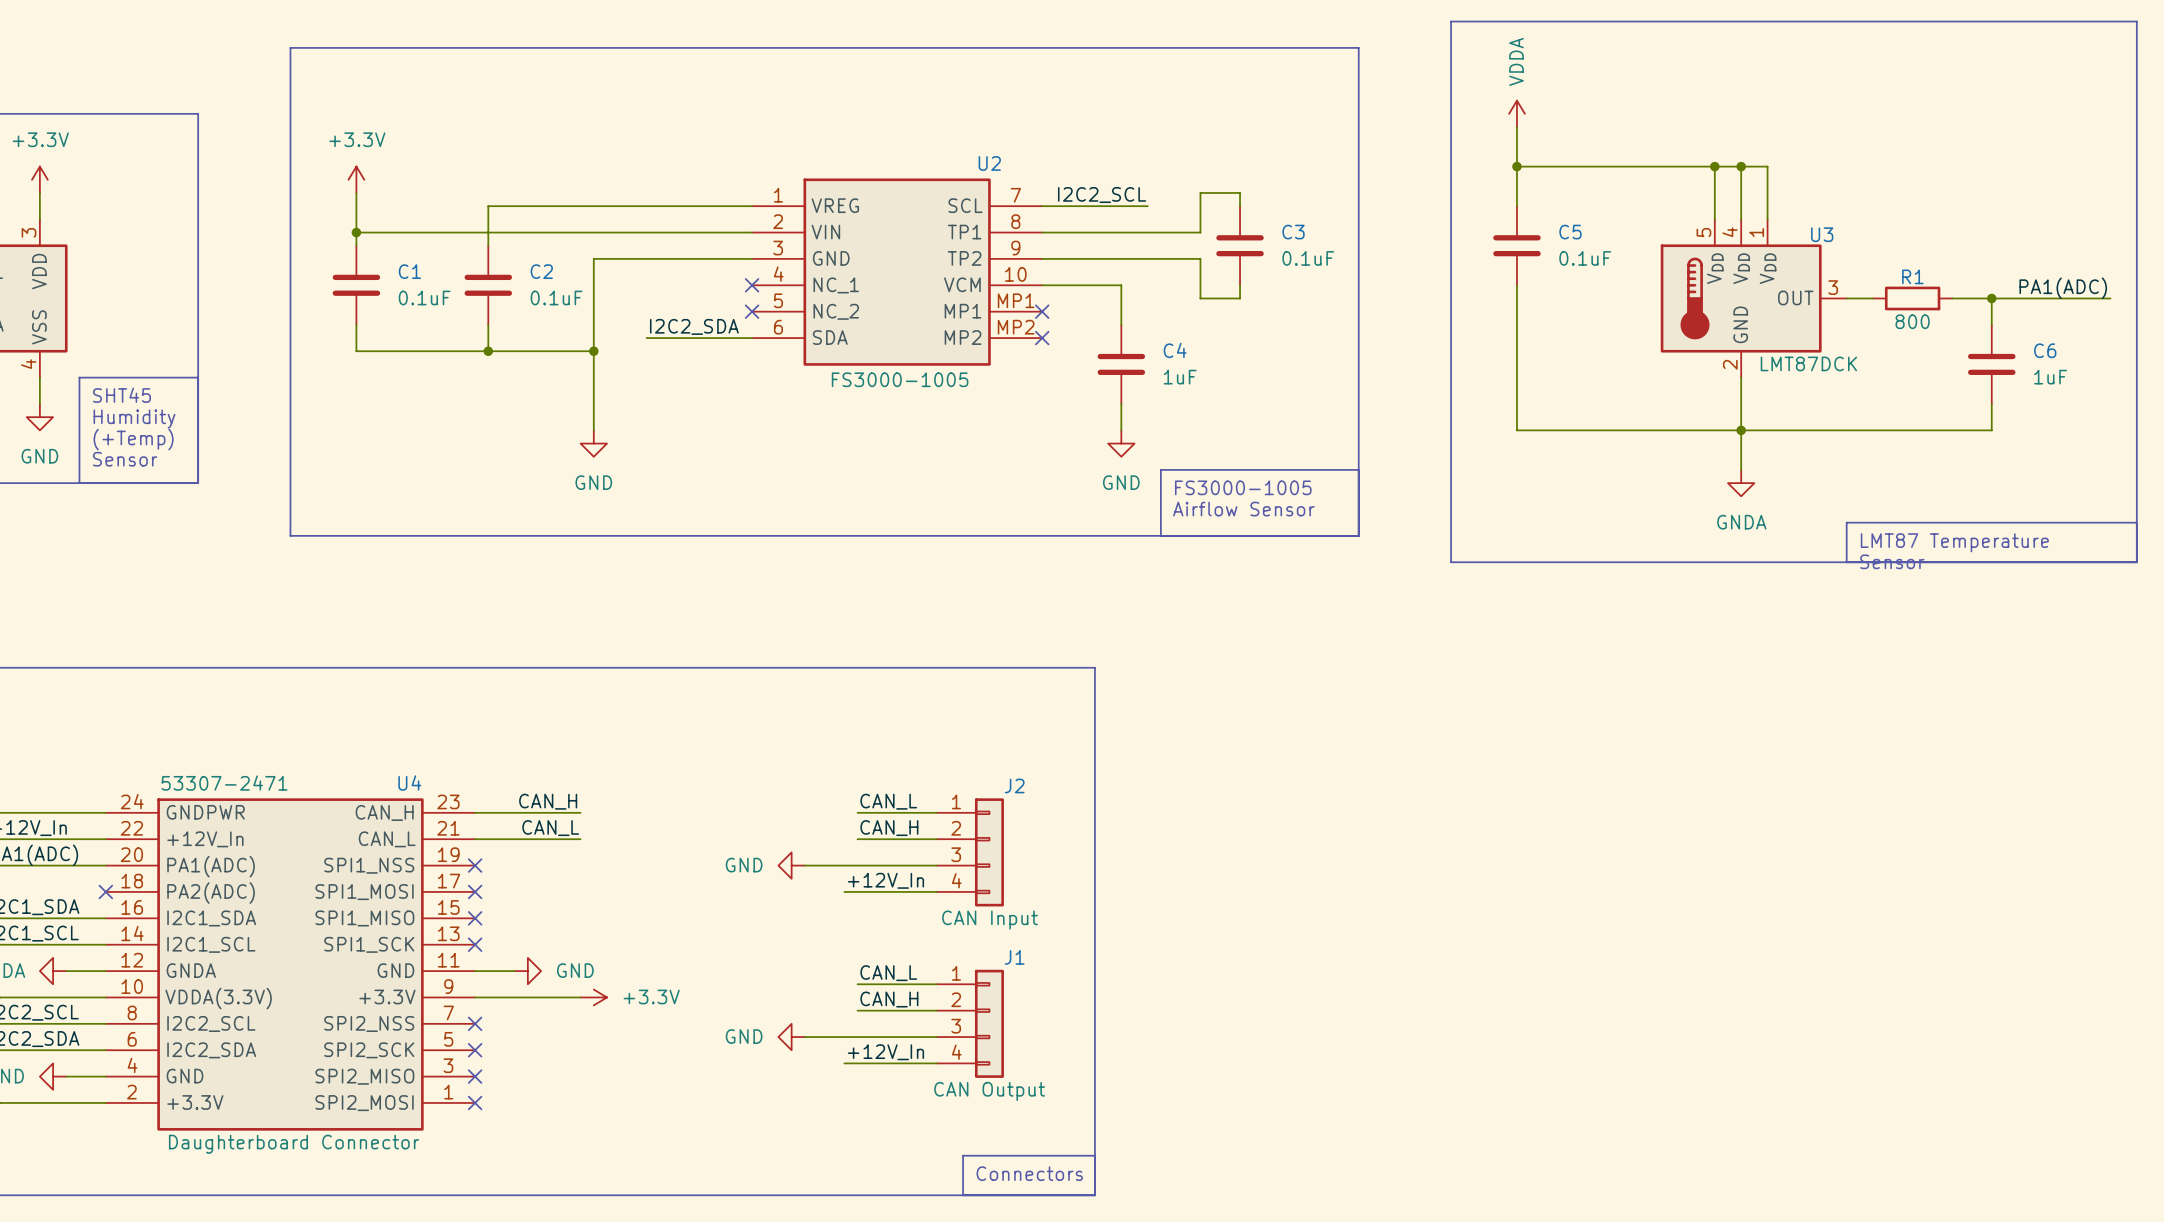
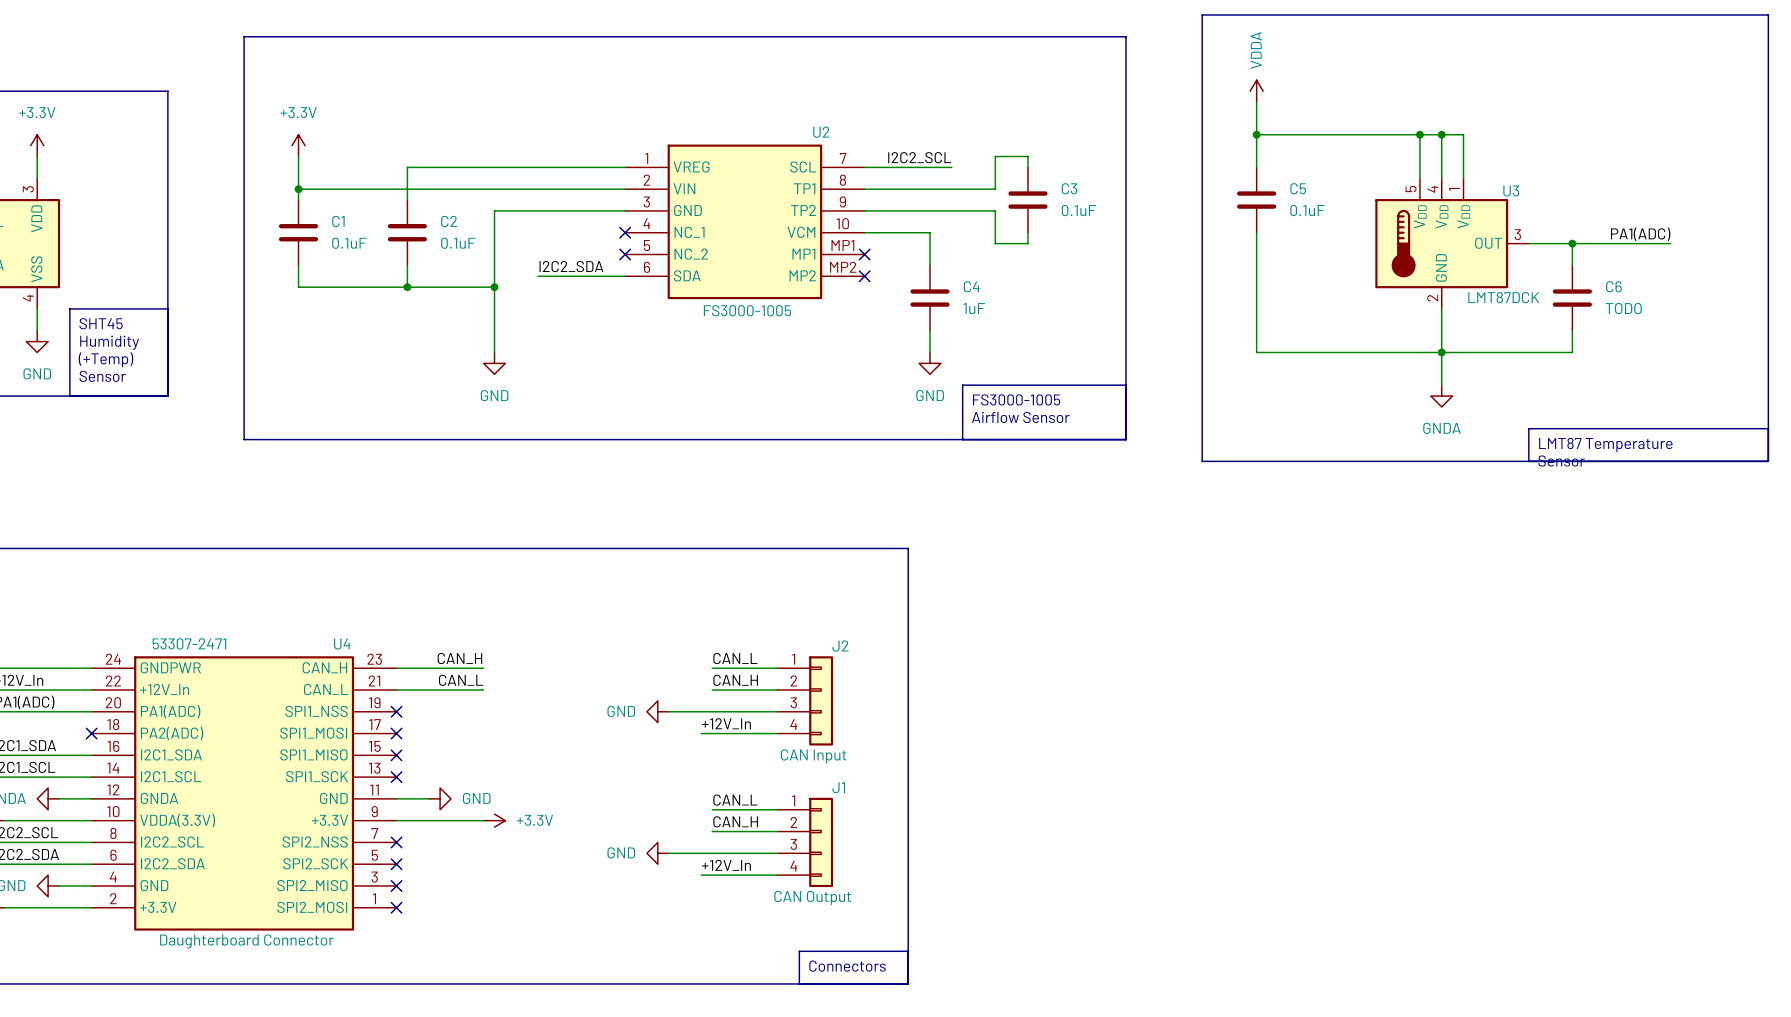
label position: PA1(ADC) (2063, 288) -> PA1(ADC) (1640, 234)
wire: none -> (1550, 243) (1615, 243)
junction: none -> (1572, 243)
R1: 800 (1912, 298) -> none
wire: (1991, 298) (1991, 324) -> (1572, 243) (1572, 265)
junction: (1991, 298) -> none
wire: (2018, 298) (2110, 298) -> none
C6 position: (1991, 364) -> (1572, 298)
C6 value: 1uF (2050, 377) -> TODO (1623, 308)
wire: (1991, 403) (1991, 430) (1899, 430) -> (1572, 330) (1572, 352)

